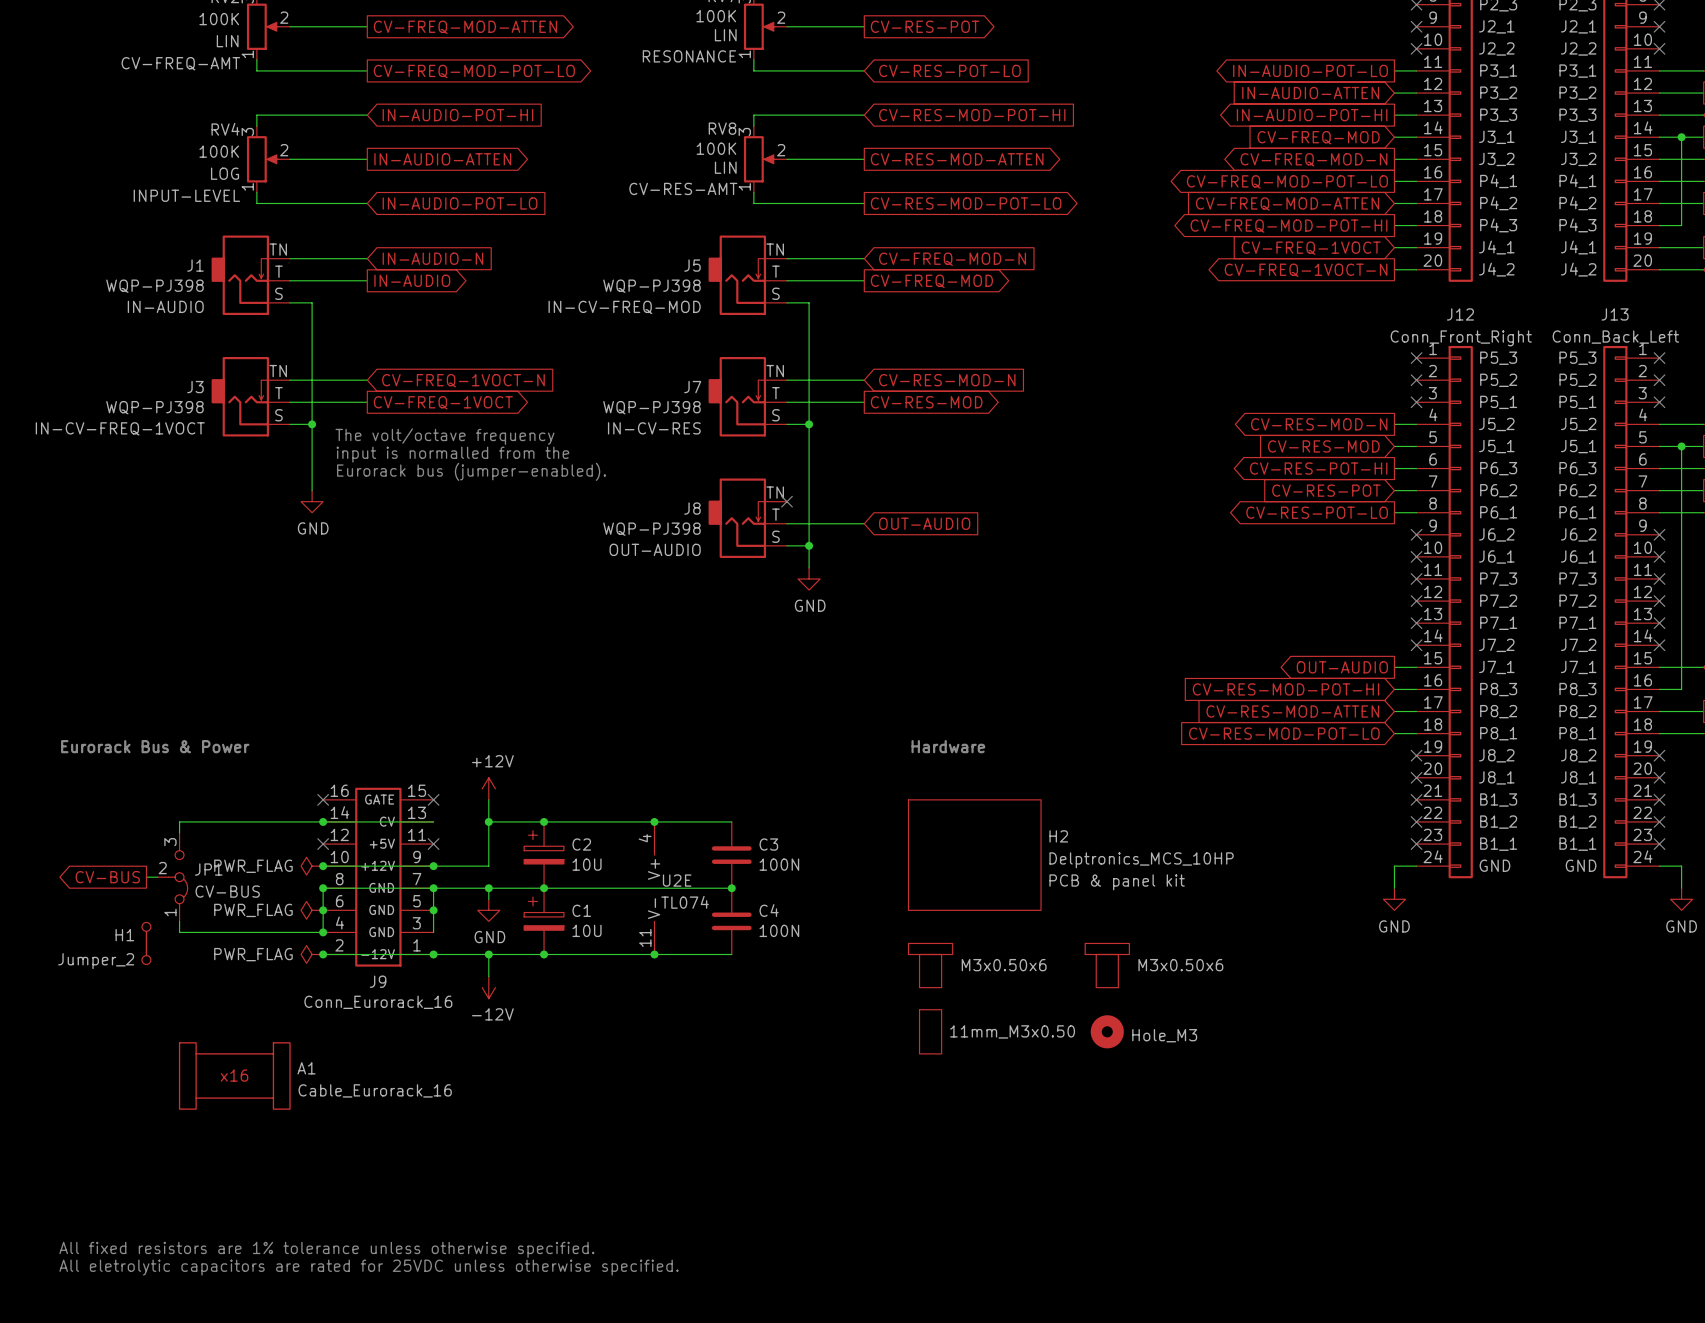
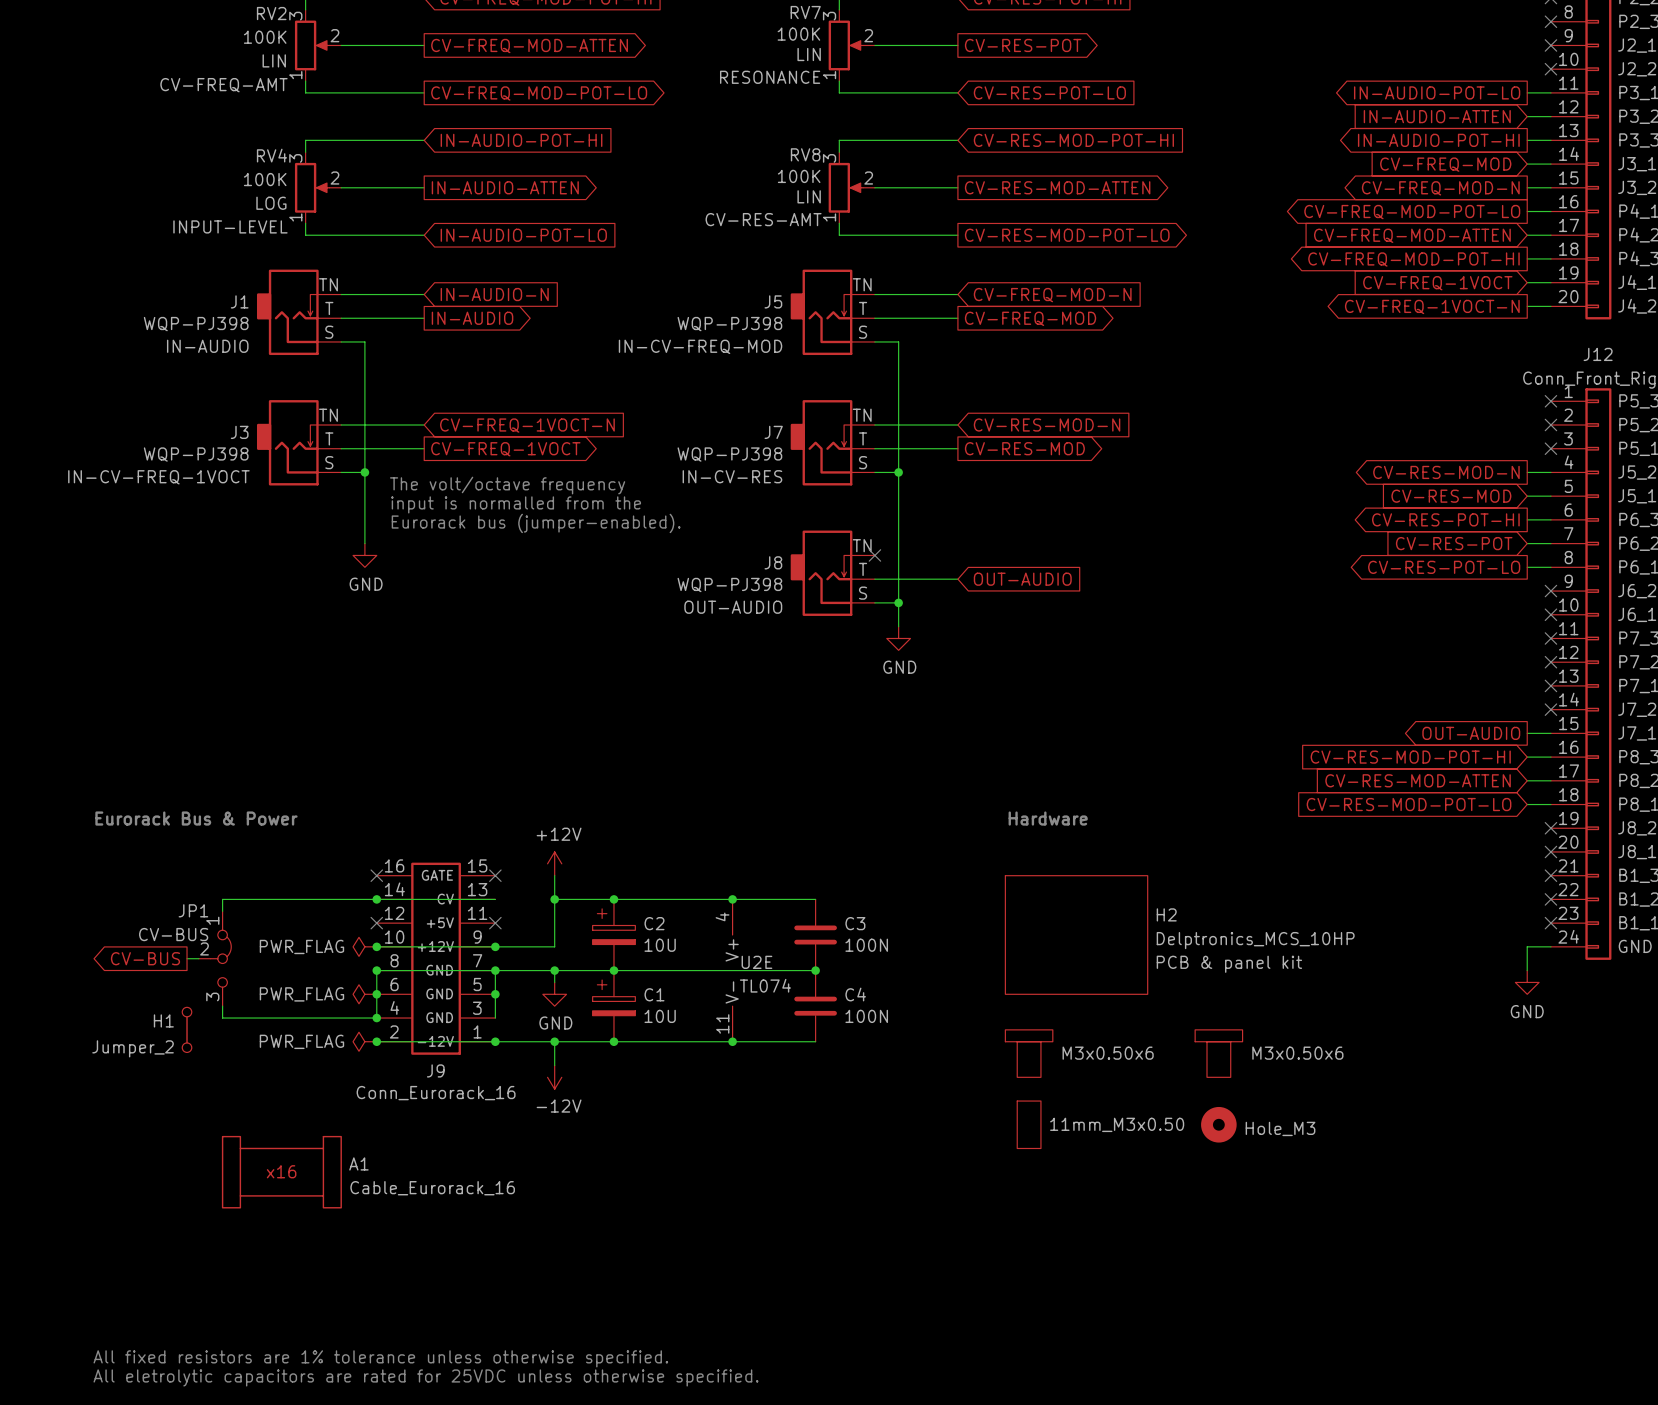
JP1 name position: JP1 (208, 869) -> JP1 (193, 910)
JP1 flip: as is (178, 877) -> up-down (221, 958)
JP1 value position: CV-BUS (227, 891) -> CV-BUS (173, 934)

